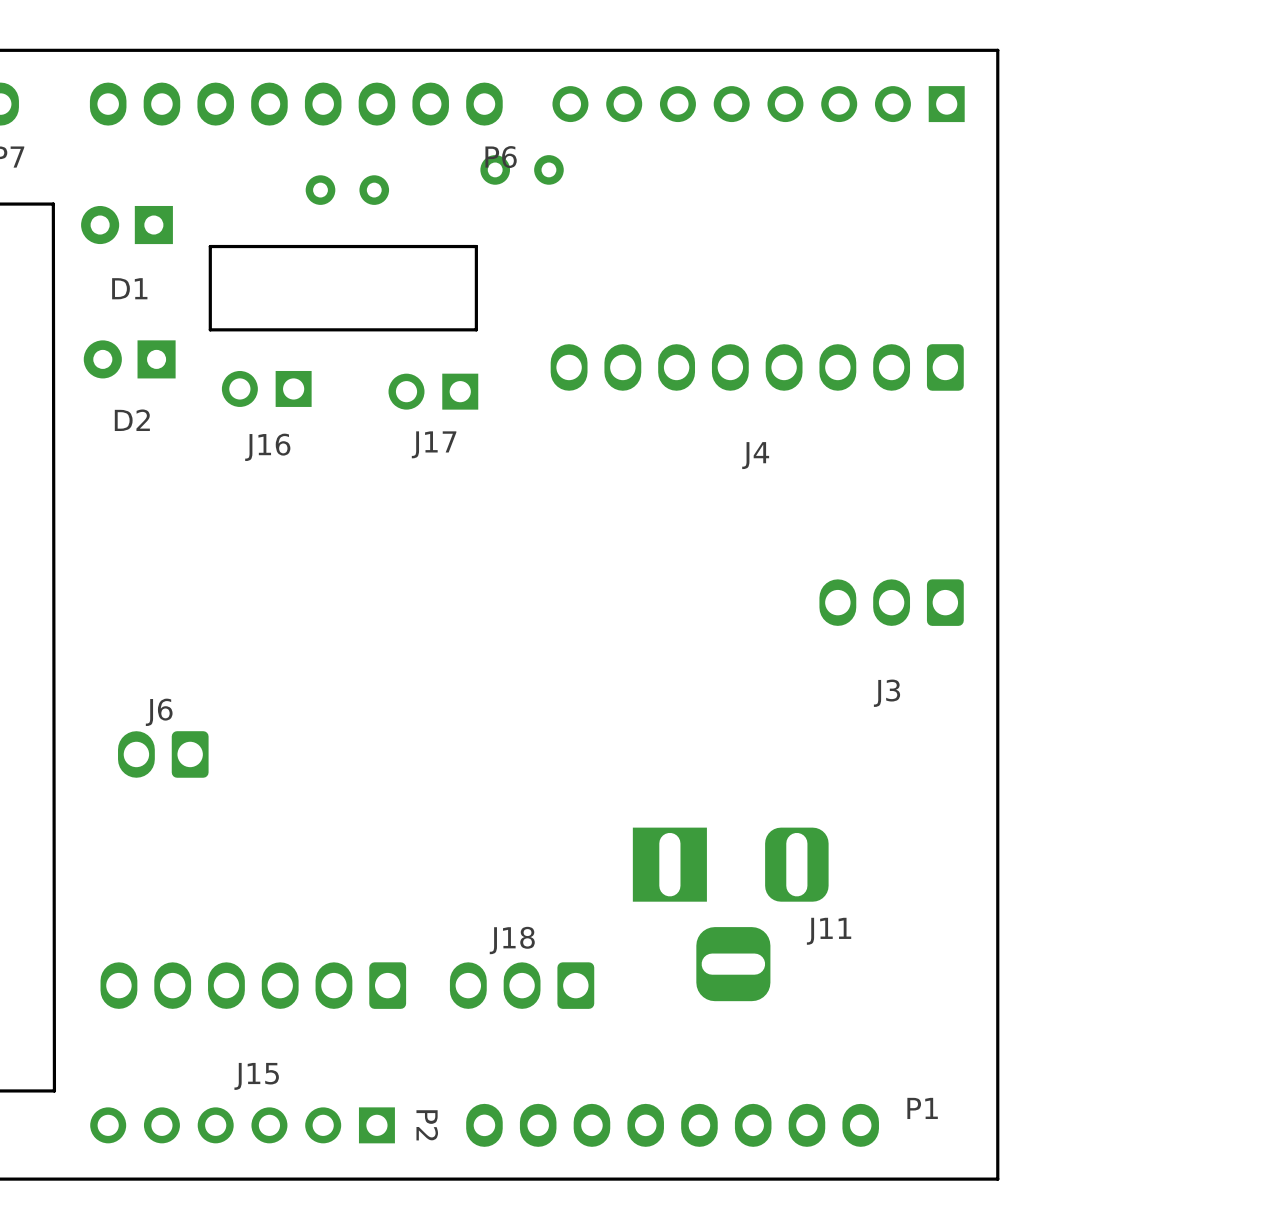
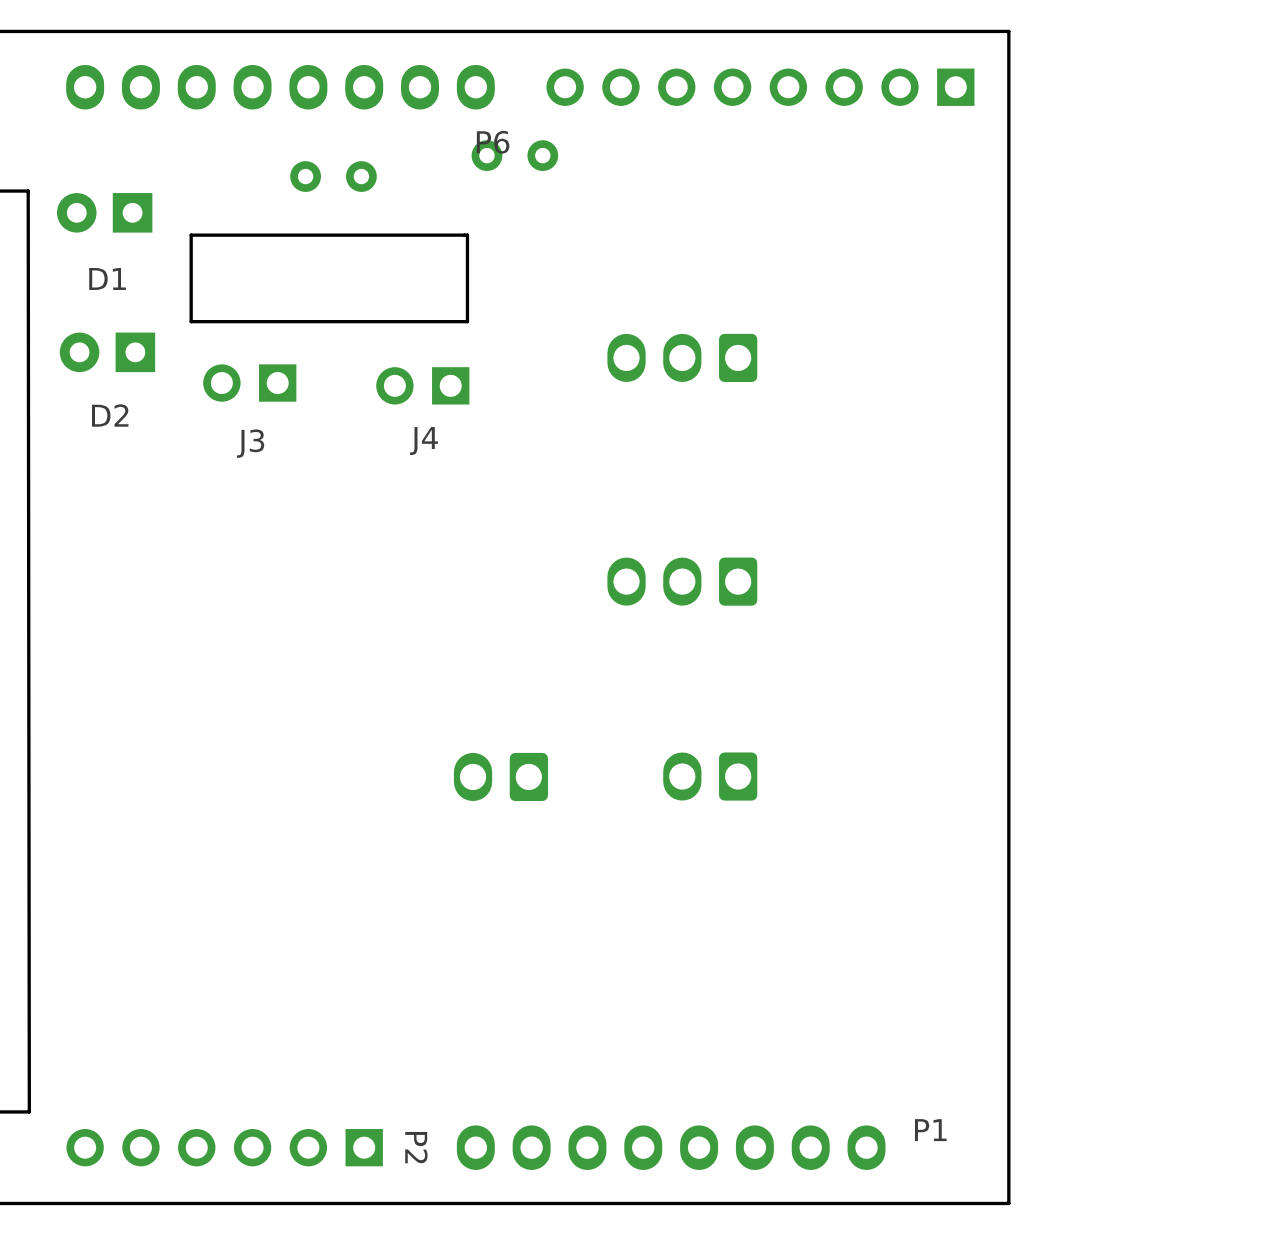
part: none -> (682, 357)
J4: (757, 367) -> none
J17 name: J17 (434, 444) -> J4 (423, 441)
J16 name: J16 (267, 447) -> J3 (250, 443)
part: none -> (682, 581)
J3: (891, 602) -> none
J6: (163, 754) -> none
part: none -> (710, 776)
part: none -> (500, 776)
J11: (730, 914) -> none
J15: (253, 985) -> none
J18: (522, 985) -> none

